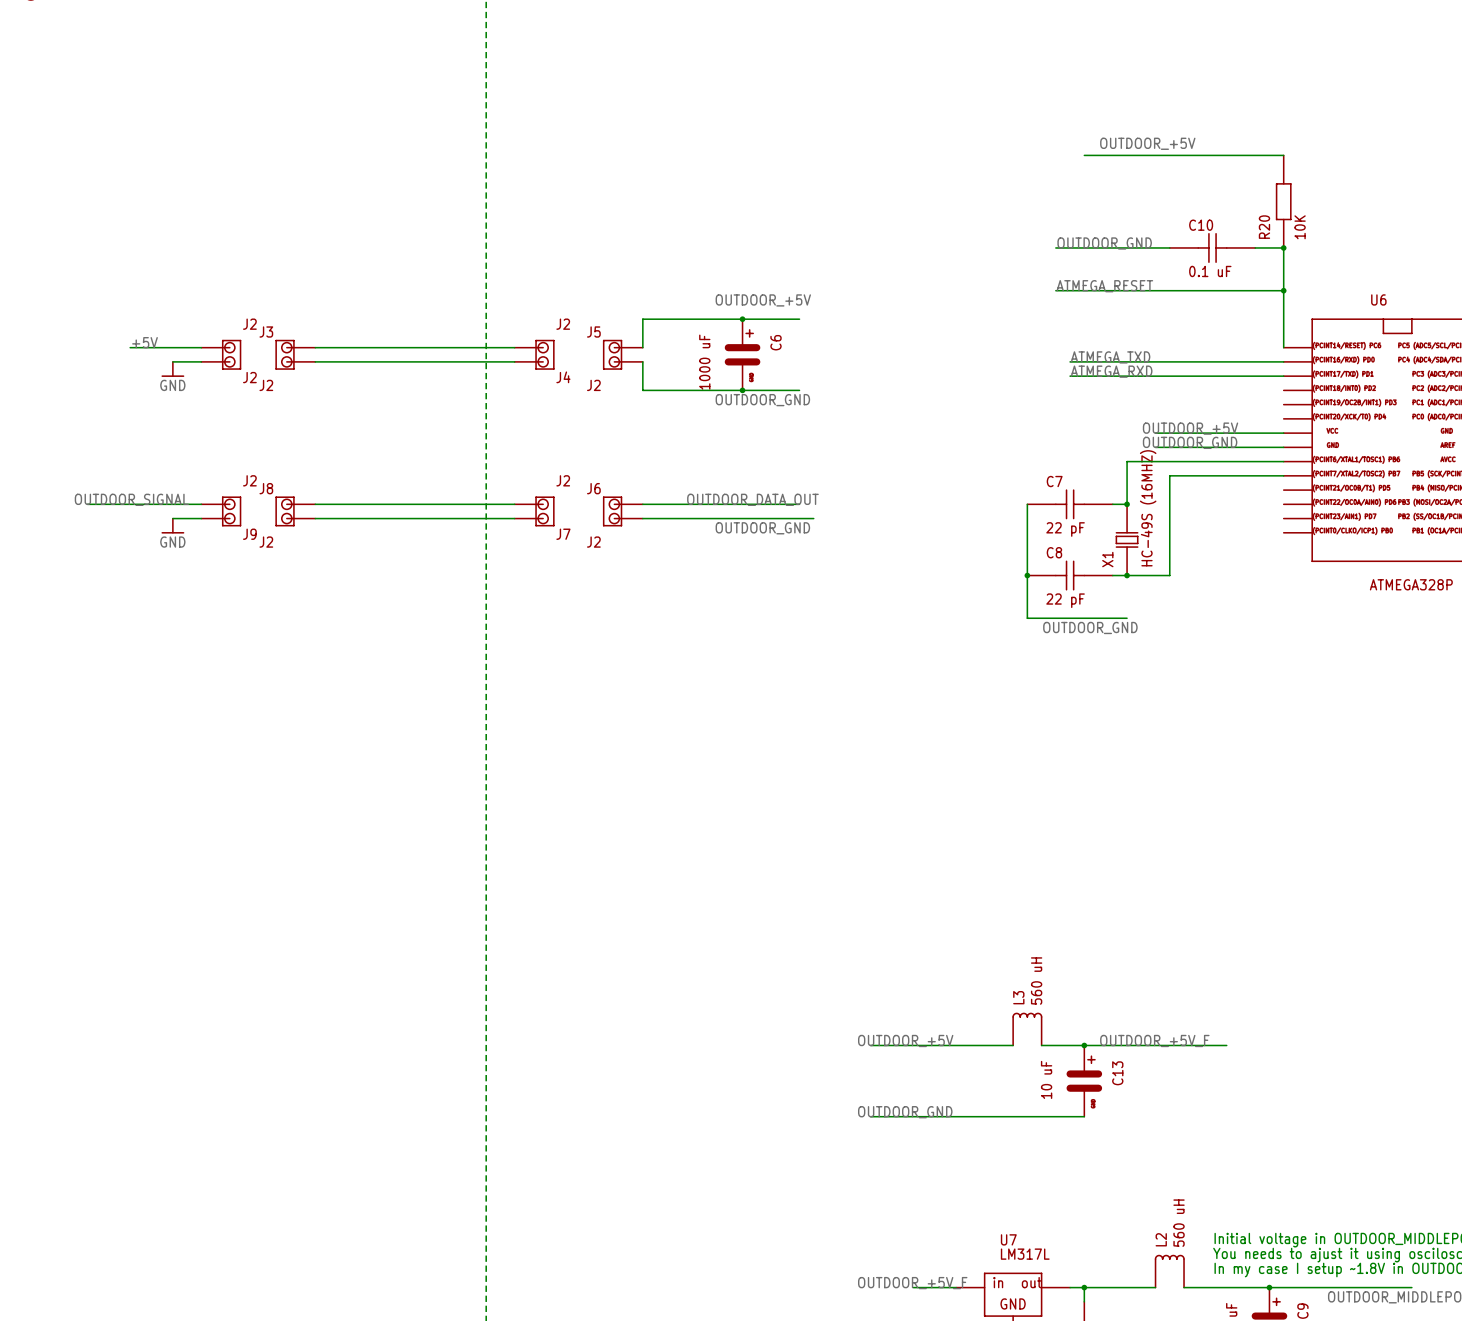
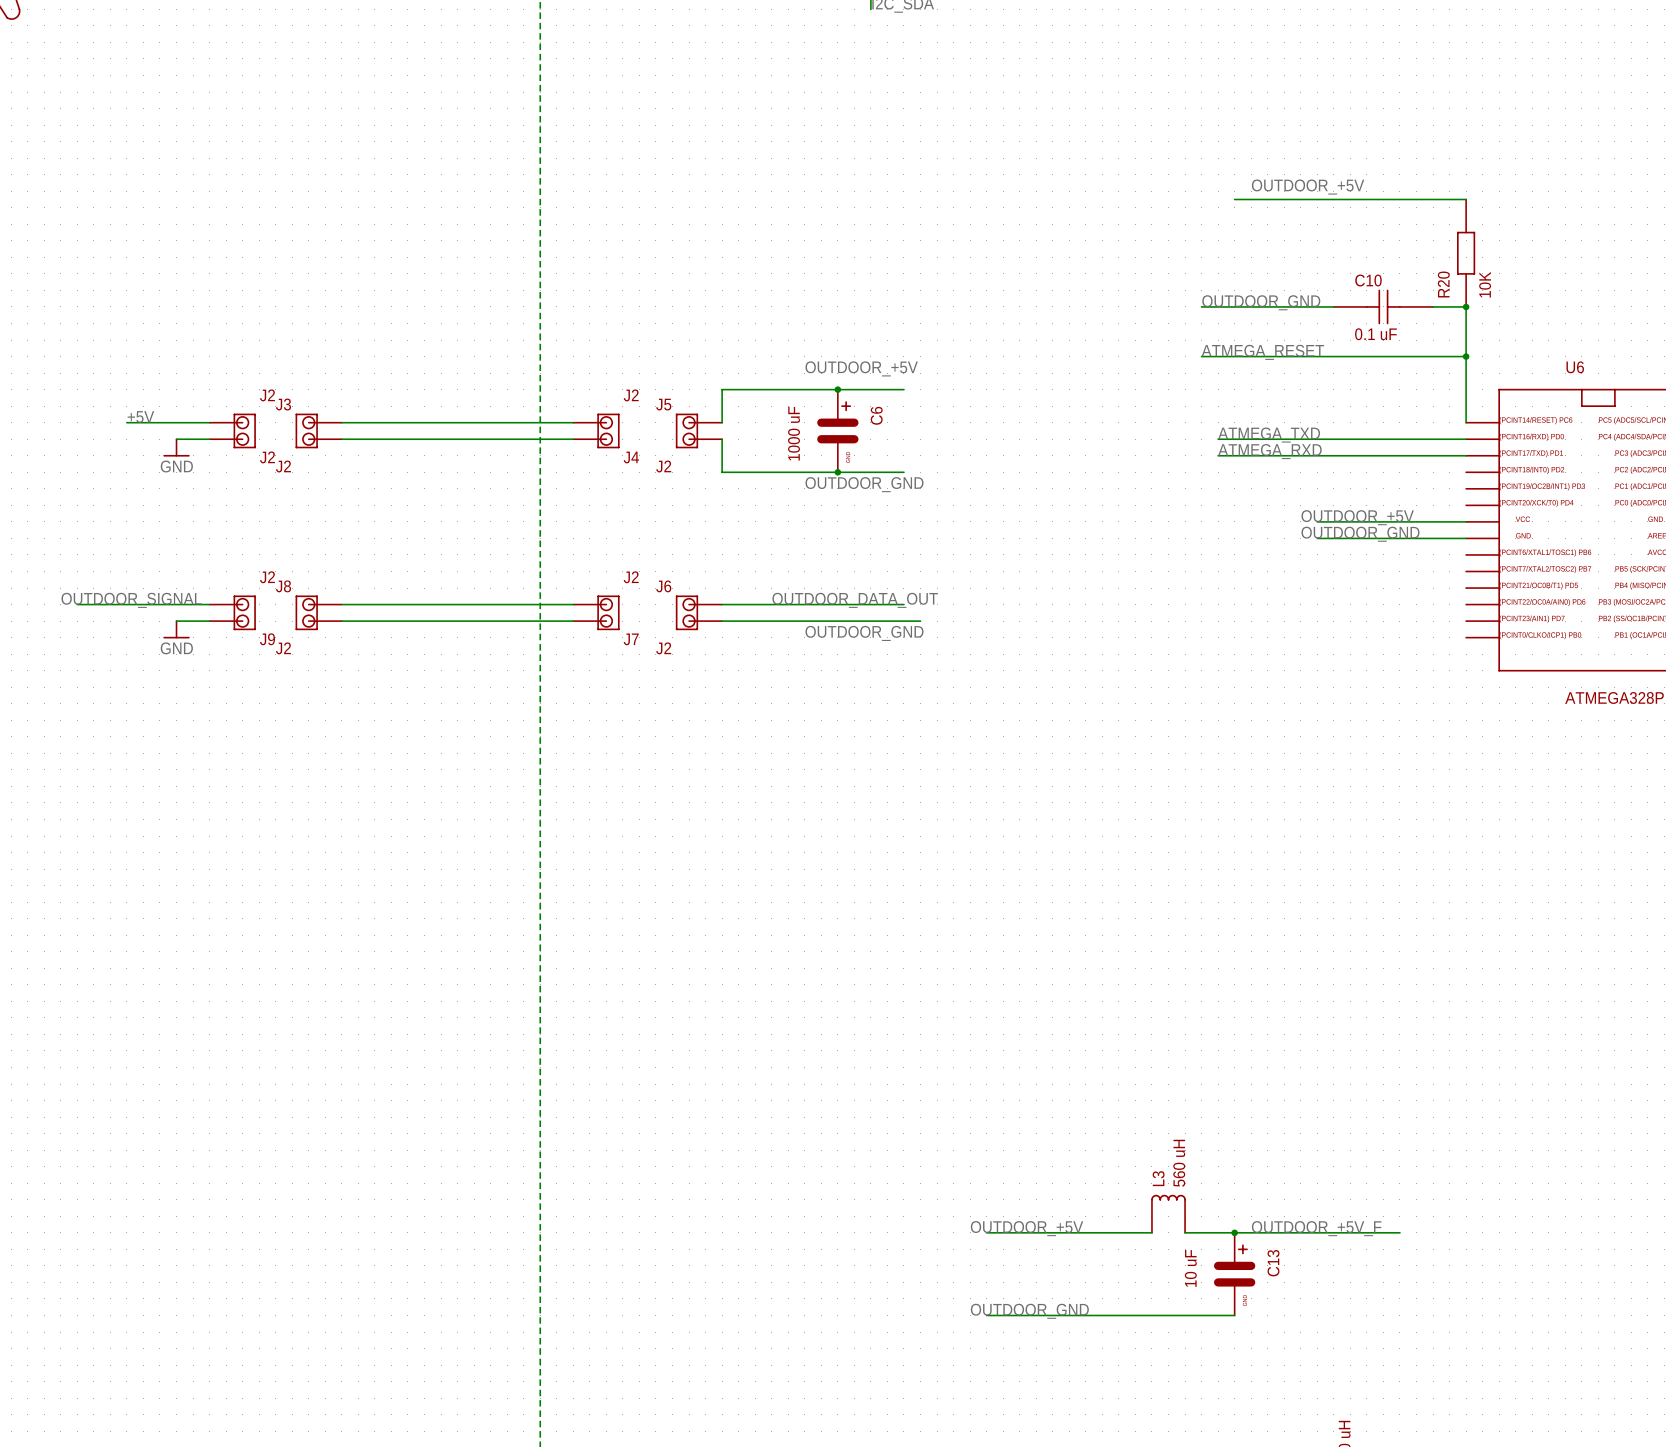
wire: (1283, 461) (1127, 461) (1127, 504) (1112, 504) -> none
wire: (1283, 475) (1169, 475) (1169, 575) (1112, 575) -> none
wire: (1027, 504) (1027, 618) (1127, 618) -> none
C7: 22 pF (1070, 504) -> none
junction: (1127, 504) -> none
X1: HC-49S (16MHZ) (1127, 539) -> none
junction: (1027, 575) -> none
C8: 22 pF (1070, 575) -> none
junction: (1127, 575) -> none
label: OUTDOOR_GND (1090, 627) -> none

